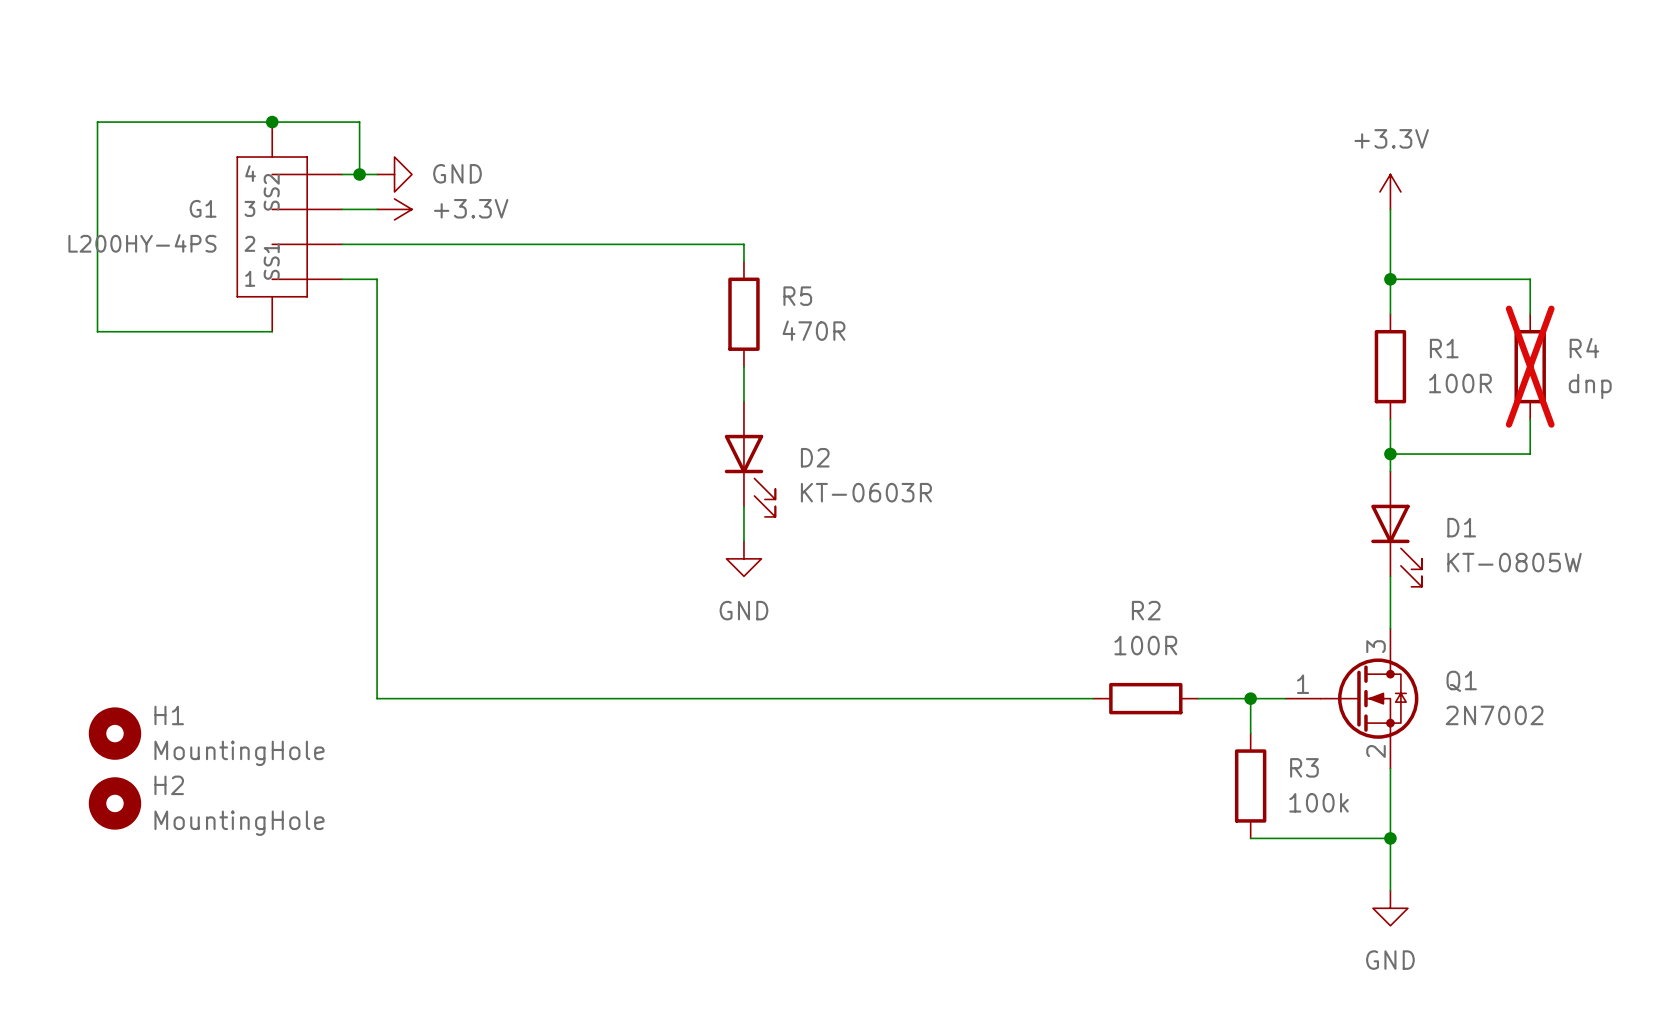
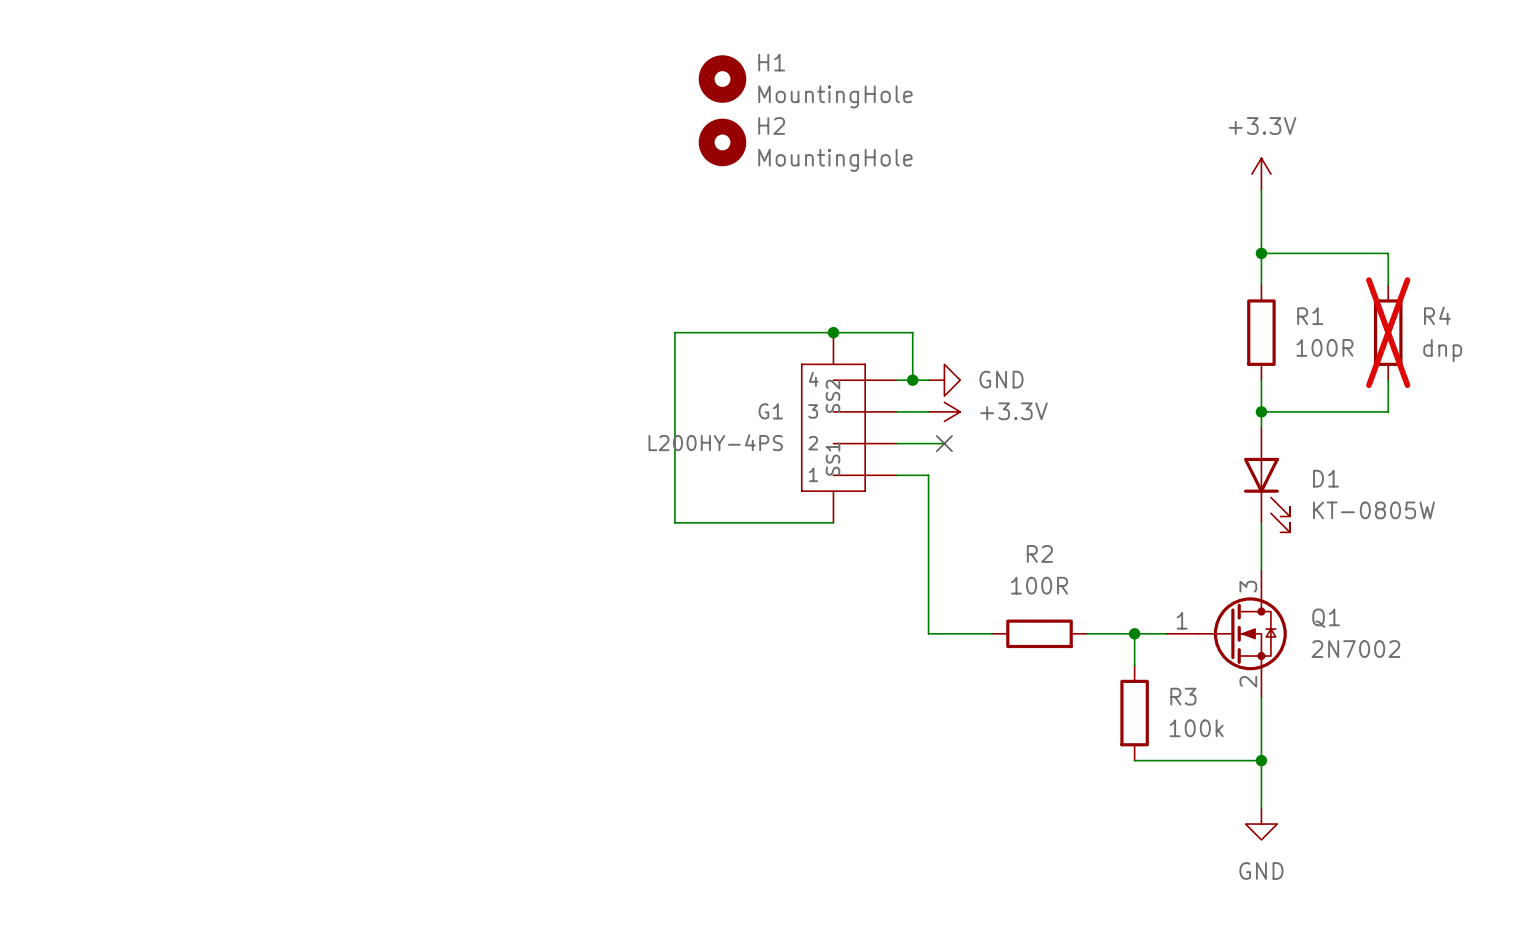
junction: (272, 122) -> none
wire: (342, 174) (377, 174) -> none
wire: (359, 174) (359, 122) (97, 122) (97, 331) (272, 331) -> none
junction: (359, 174) -> none
power symbol: GND (394, 174) -> none
wire: (342, 209) (377, 209) -> none
power symbol: +3.3V (394, 209) -> none
G1 position: (289, 226) -> (849, 427)
wire: (342, 244) (743, 244) (743, 261) -> none
wire: (342, 279) (377, 279) (377, 698) (1023, 698) -> (896, 475) (928, 475) (928, 633)
R5: 470R (743, 314) -> none
wire: none -> (674, 332) (912, 332) (912, 380)
junction: none -> (833, 332)
wire: none -> (896, 380) (928, 380)
junction: none -> (912, 380)
wire: none -> (896, 411) (928, 411)
power symbol: none -> +3.3V (944, 411)
D2: KT-0603R (750, 459) -> none
wire: none -> (896, 443) (944, 443)
no-connect mark: none -> (944, 443)
wire: none -> (674, 491) (674, 522) (833, 522)
power symbol rotation: 0° (743, 558) -> 90° counterclockwise (944, 380)
power symbol position: GND (743, 558) -> GND (944, 380)
H1 position: (114, 733) -> (722, 79)
H2 position: (114, 803) -> (722, 142)

